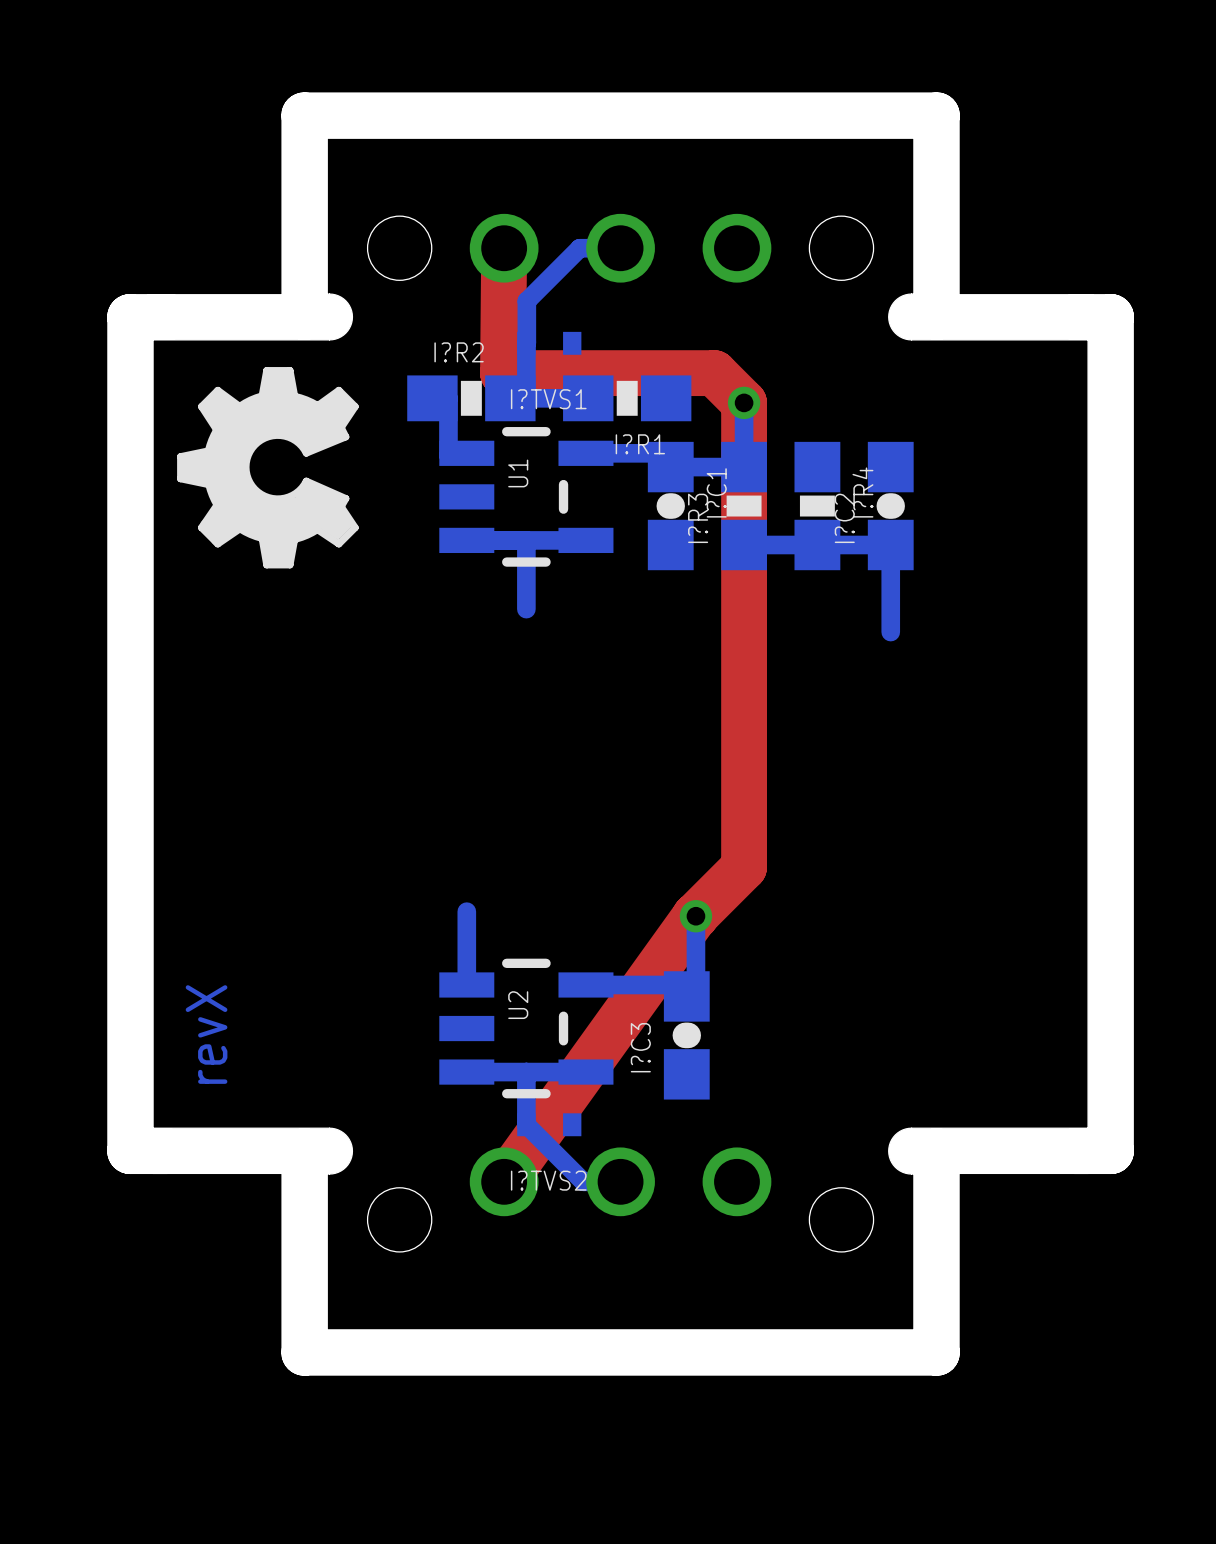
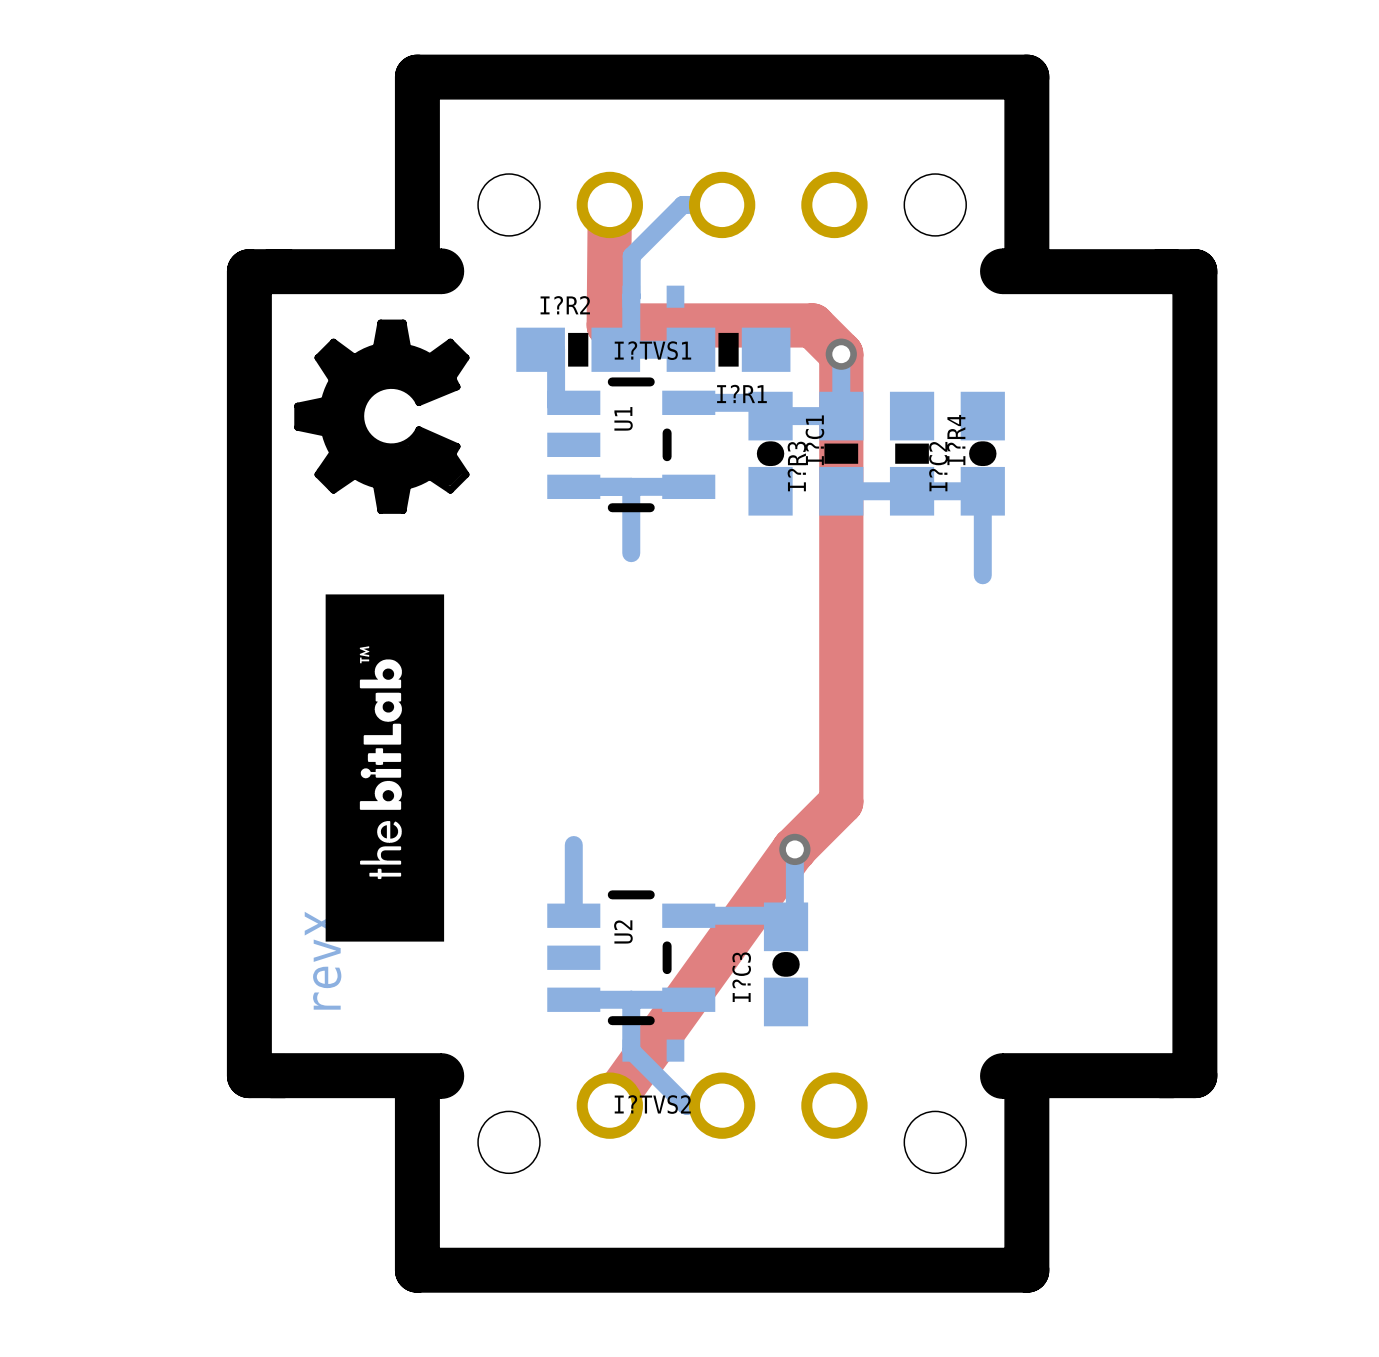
drawing: none -> [325, 594, 445, 942]

